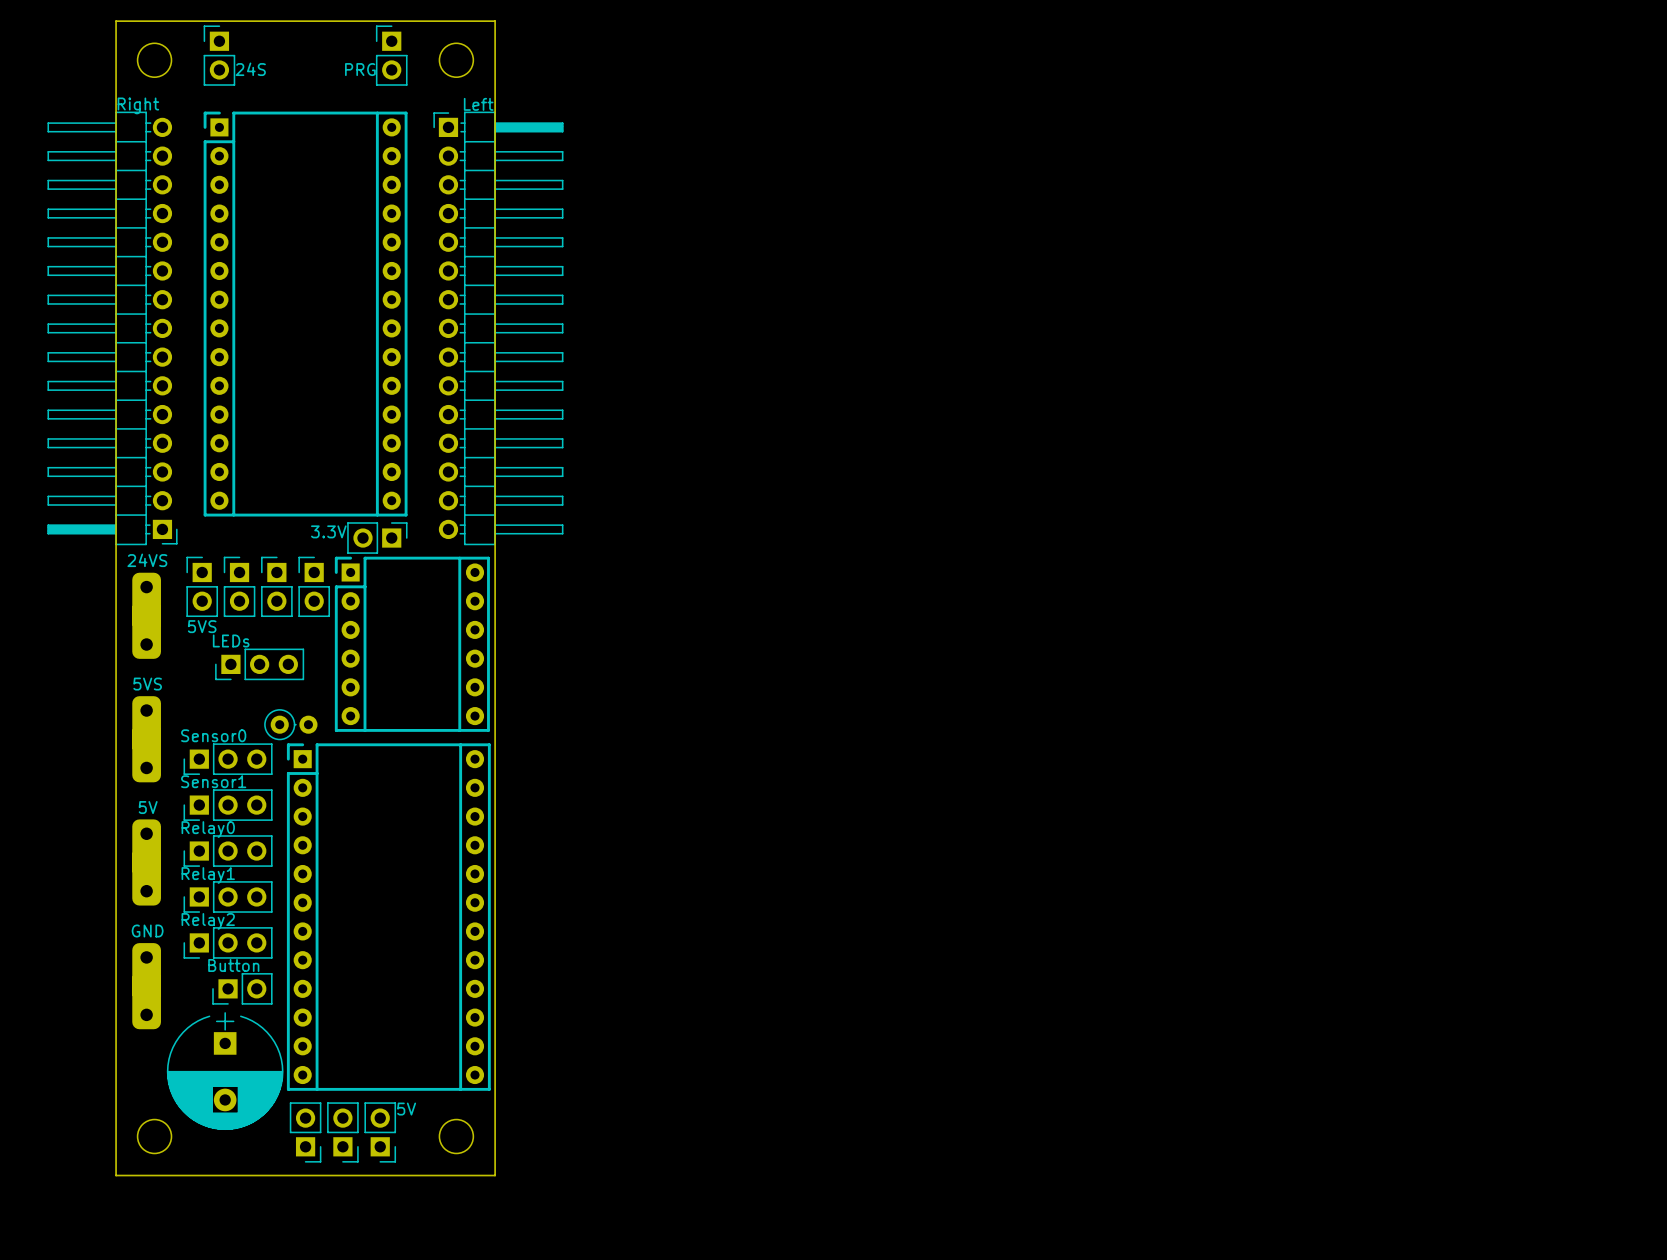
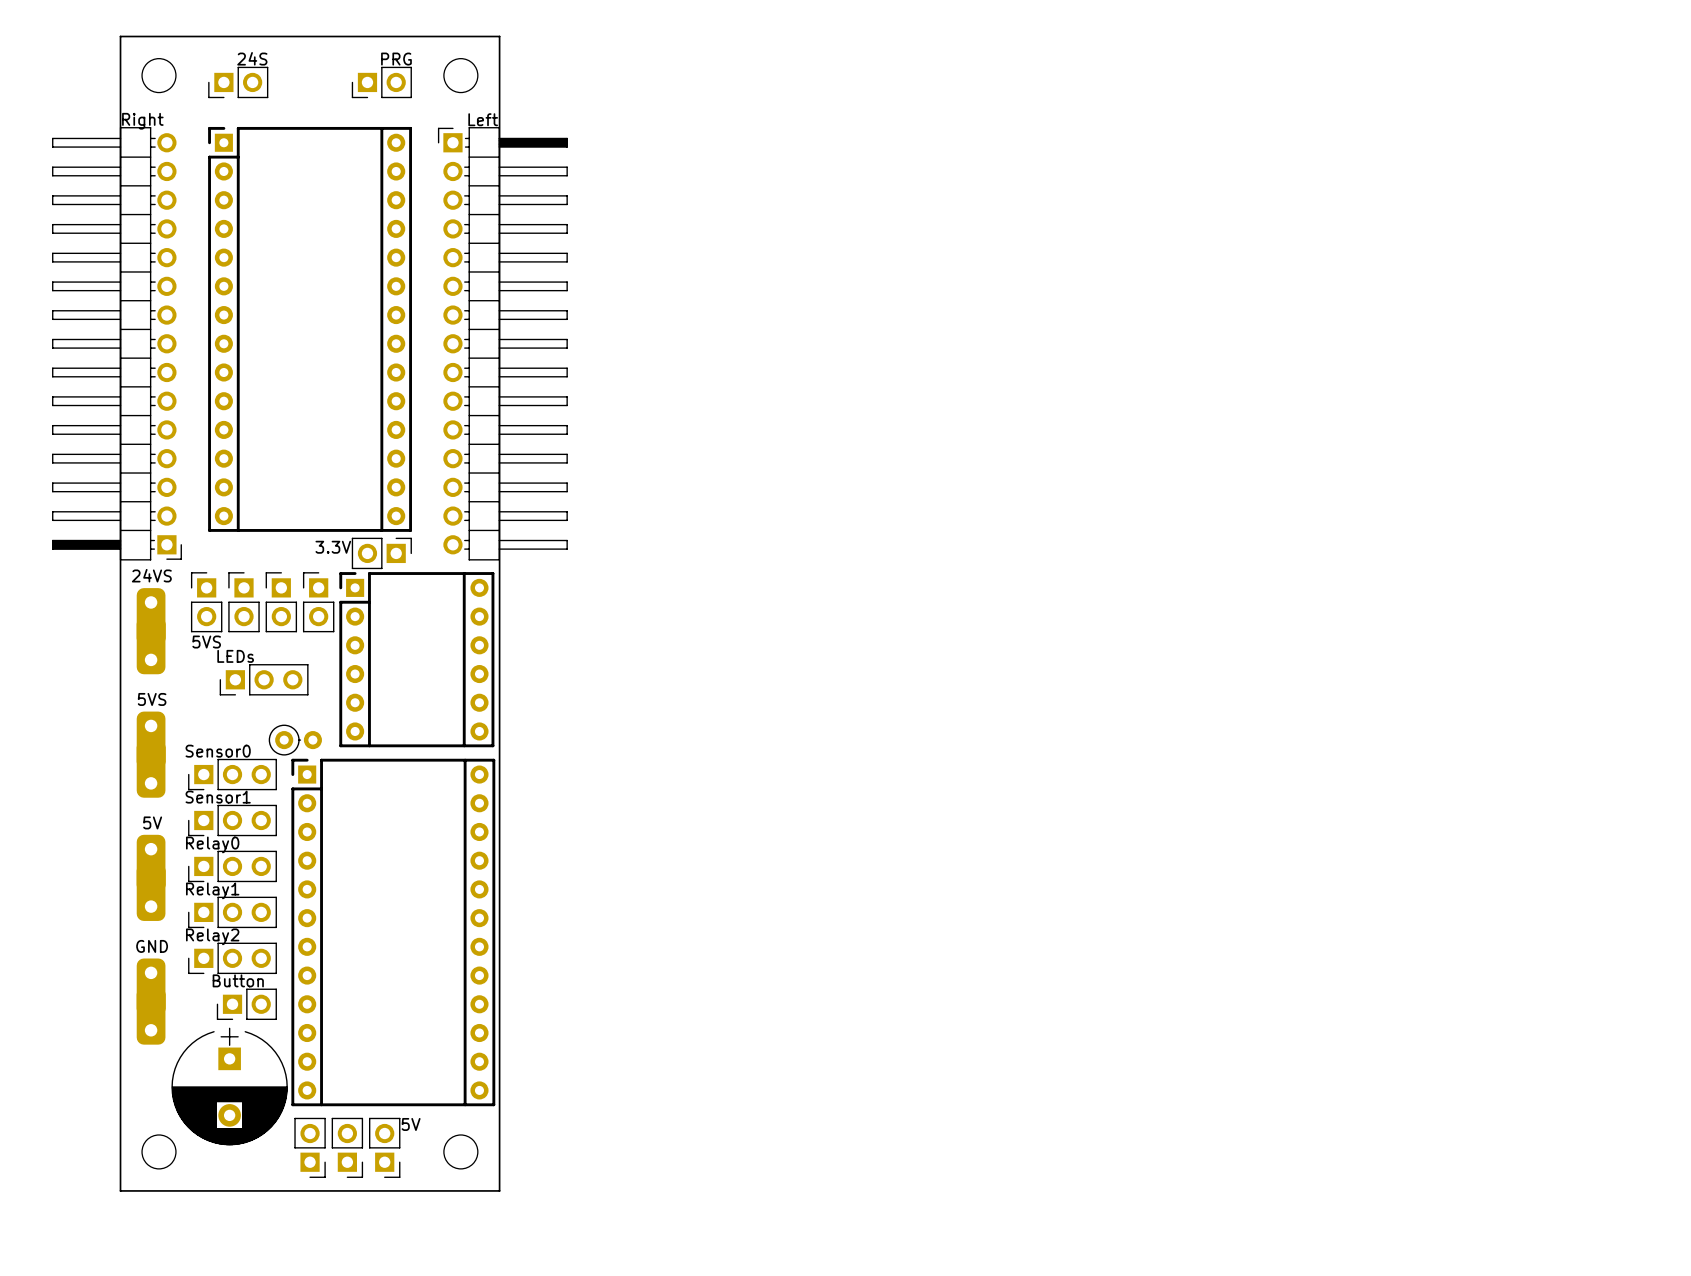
part rotation: 0° (219, 55) -> 90° counterclockwise (238, 82)
part rotation: 0° (391, 55) -> 90° counterclockwise (381, 82)
part value position: PRG (360, 69) -> PRG (396, 59)

